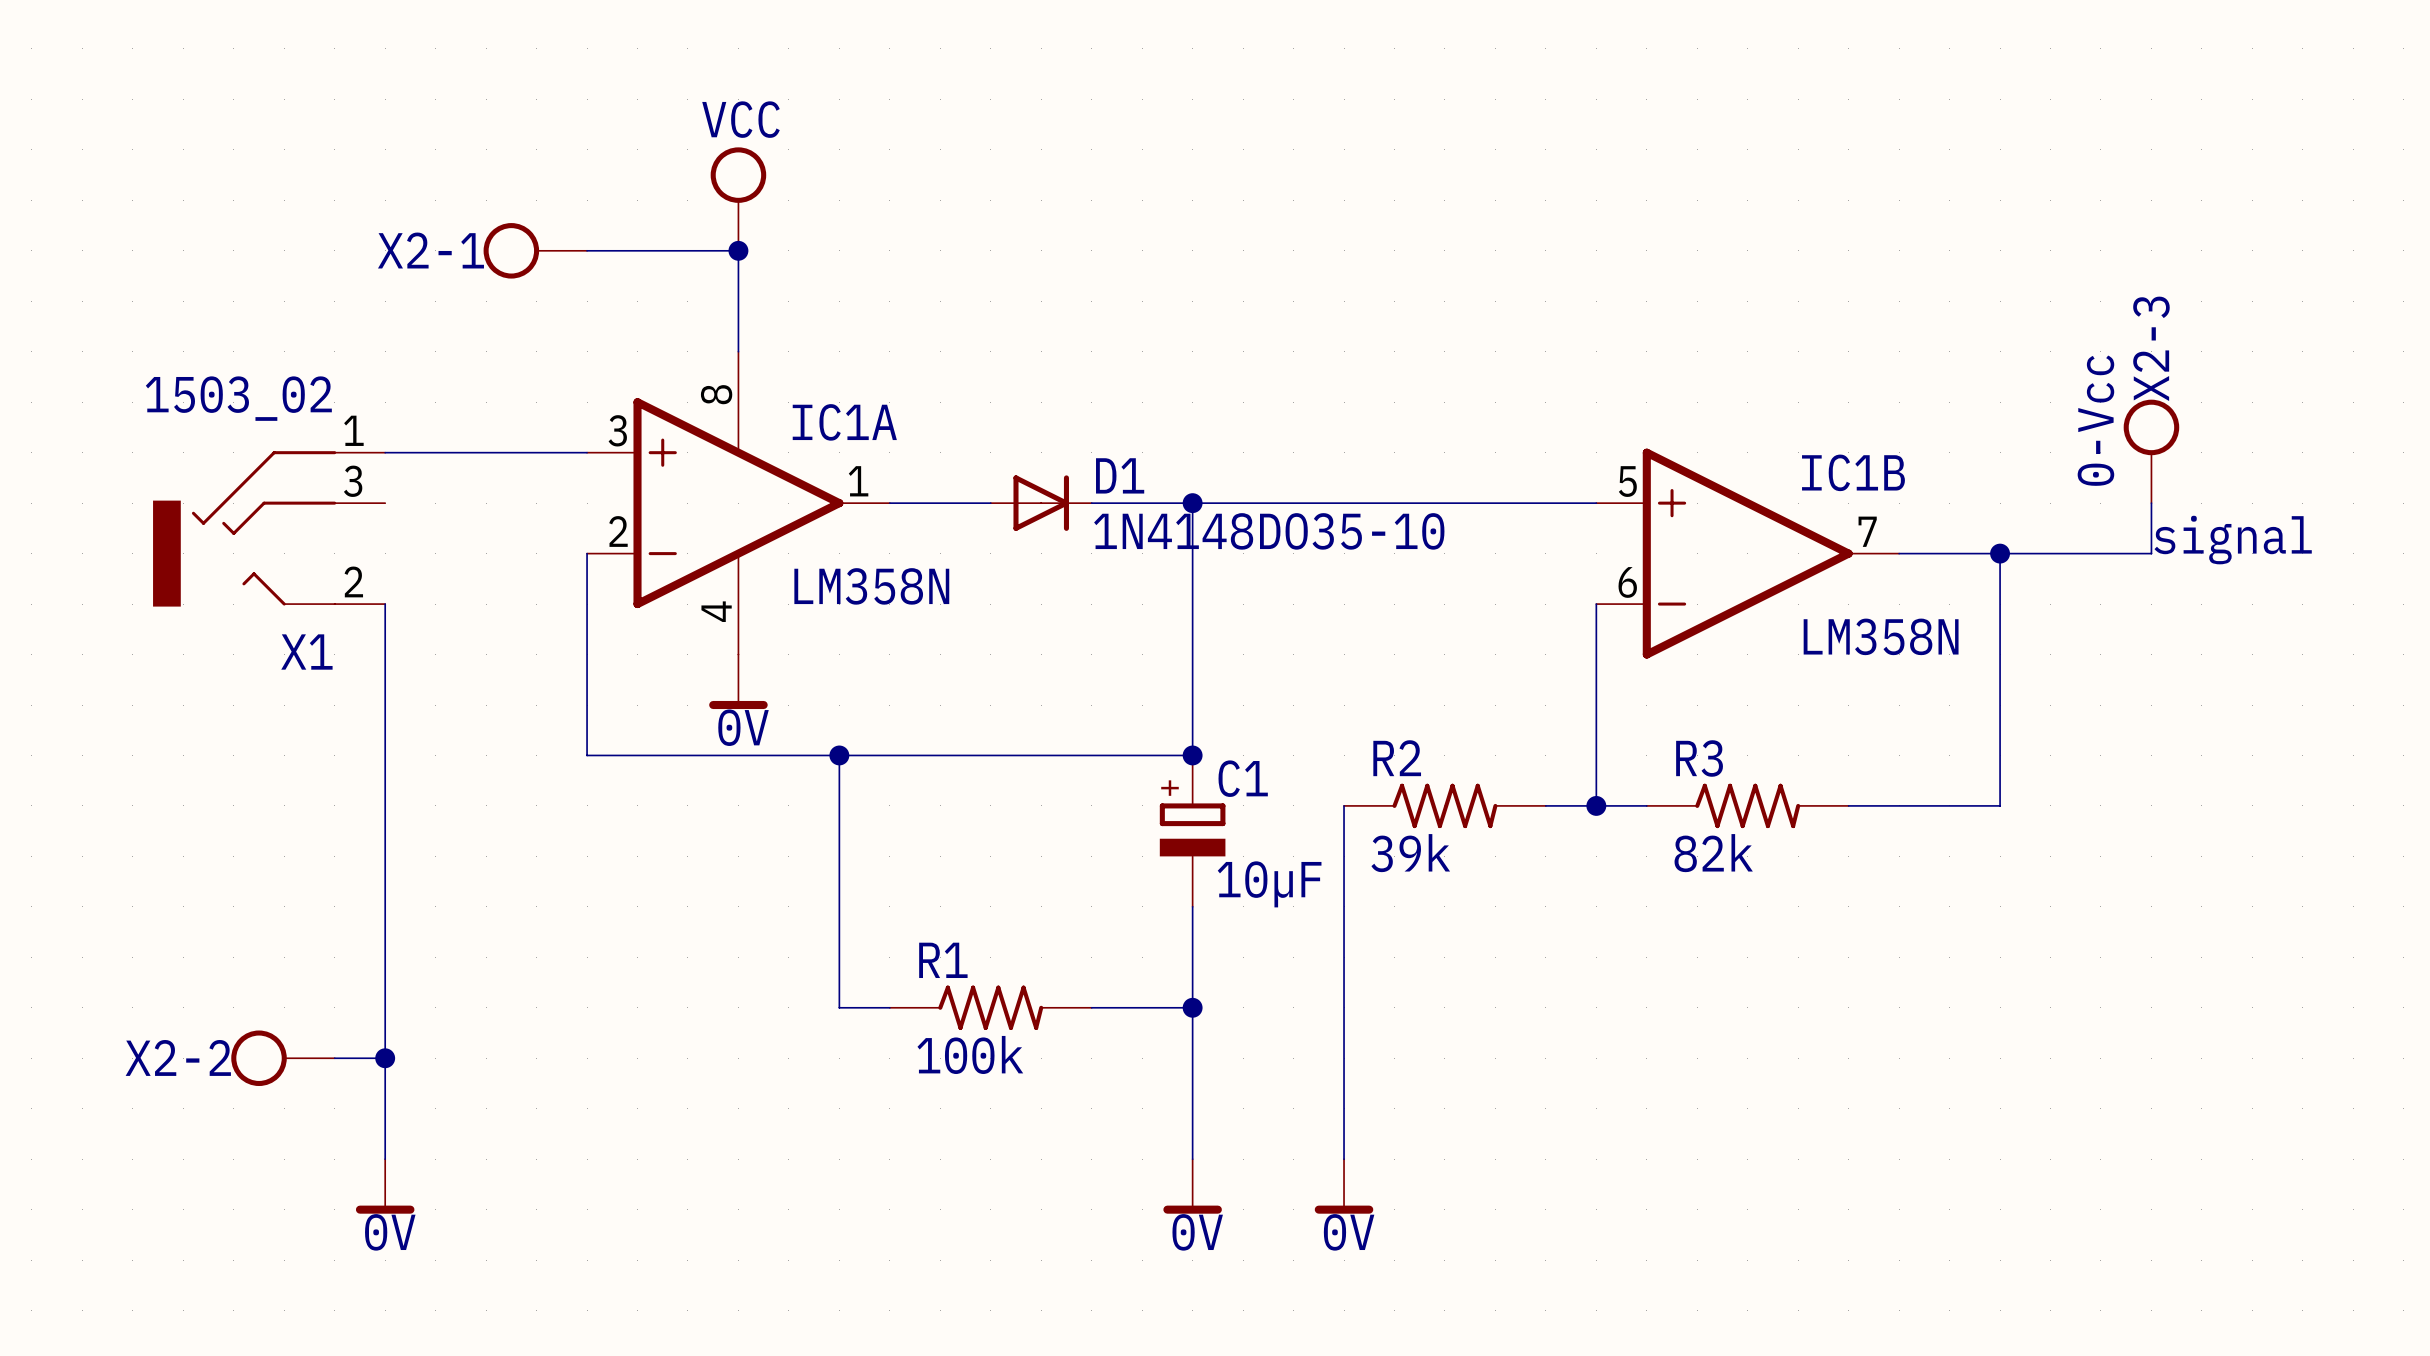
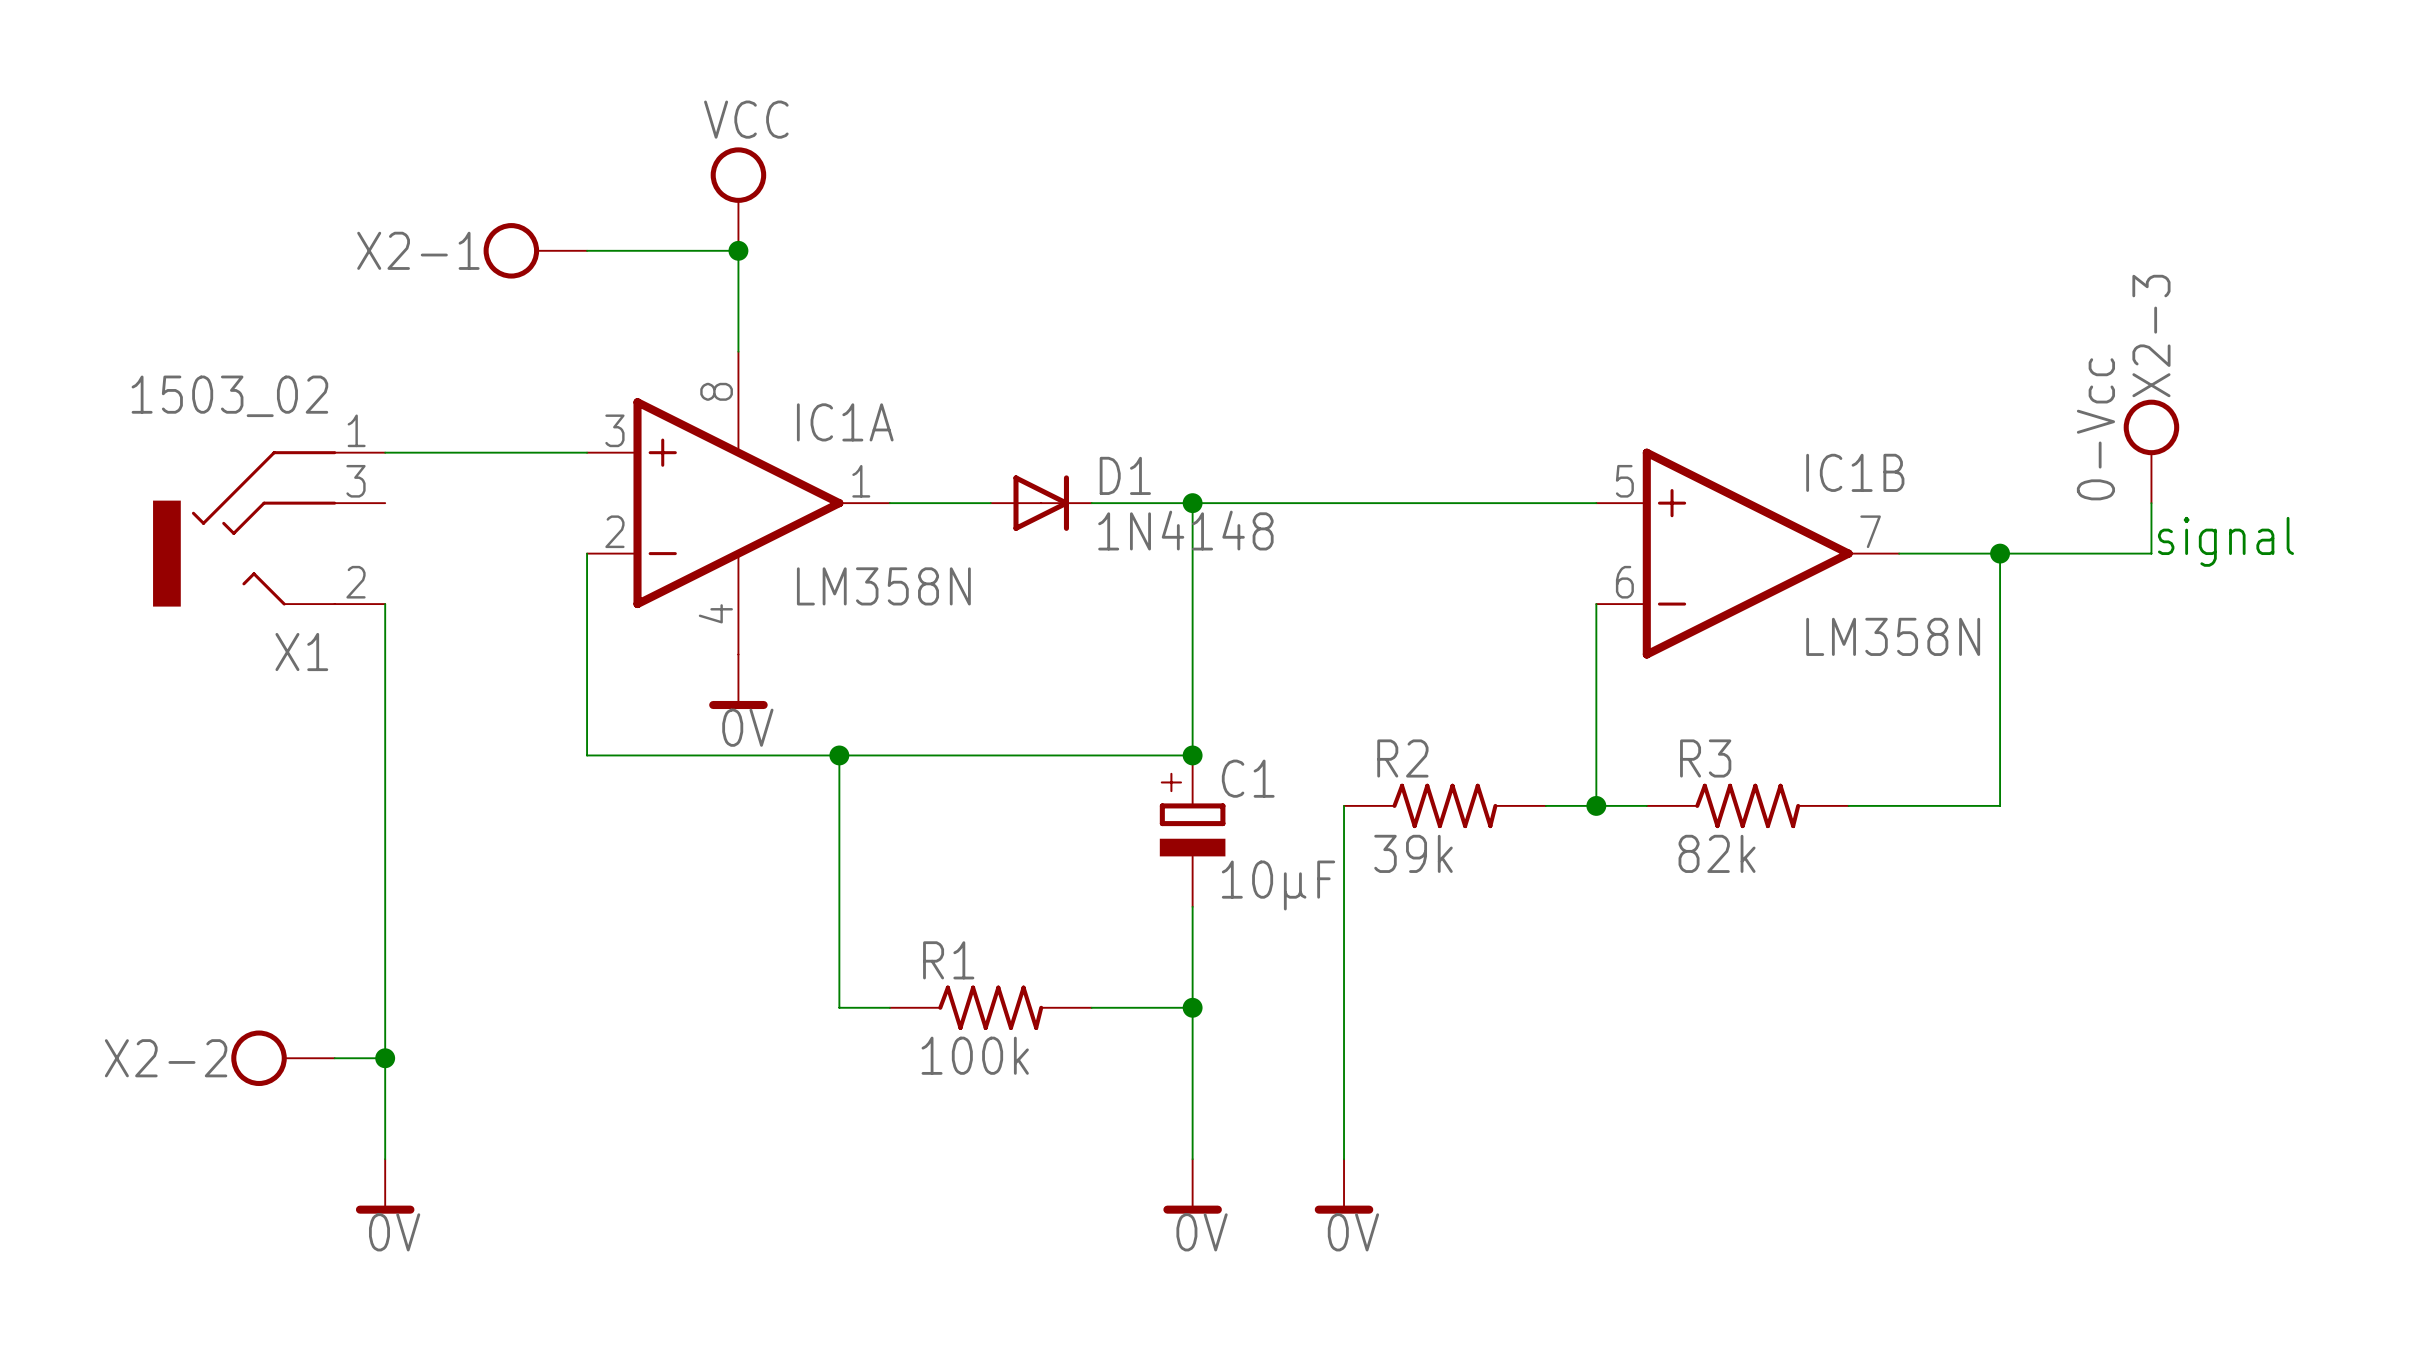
D1 value: 1N4148DO35-10 (1269, 531) -> 1N4148 (1185, 530)

